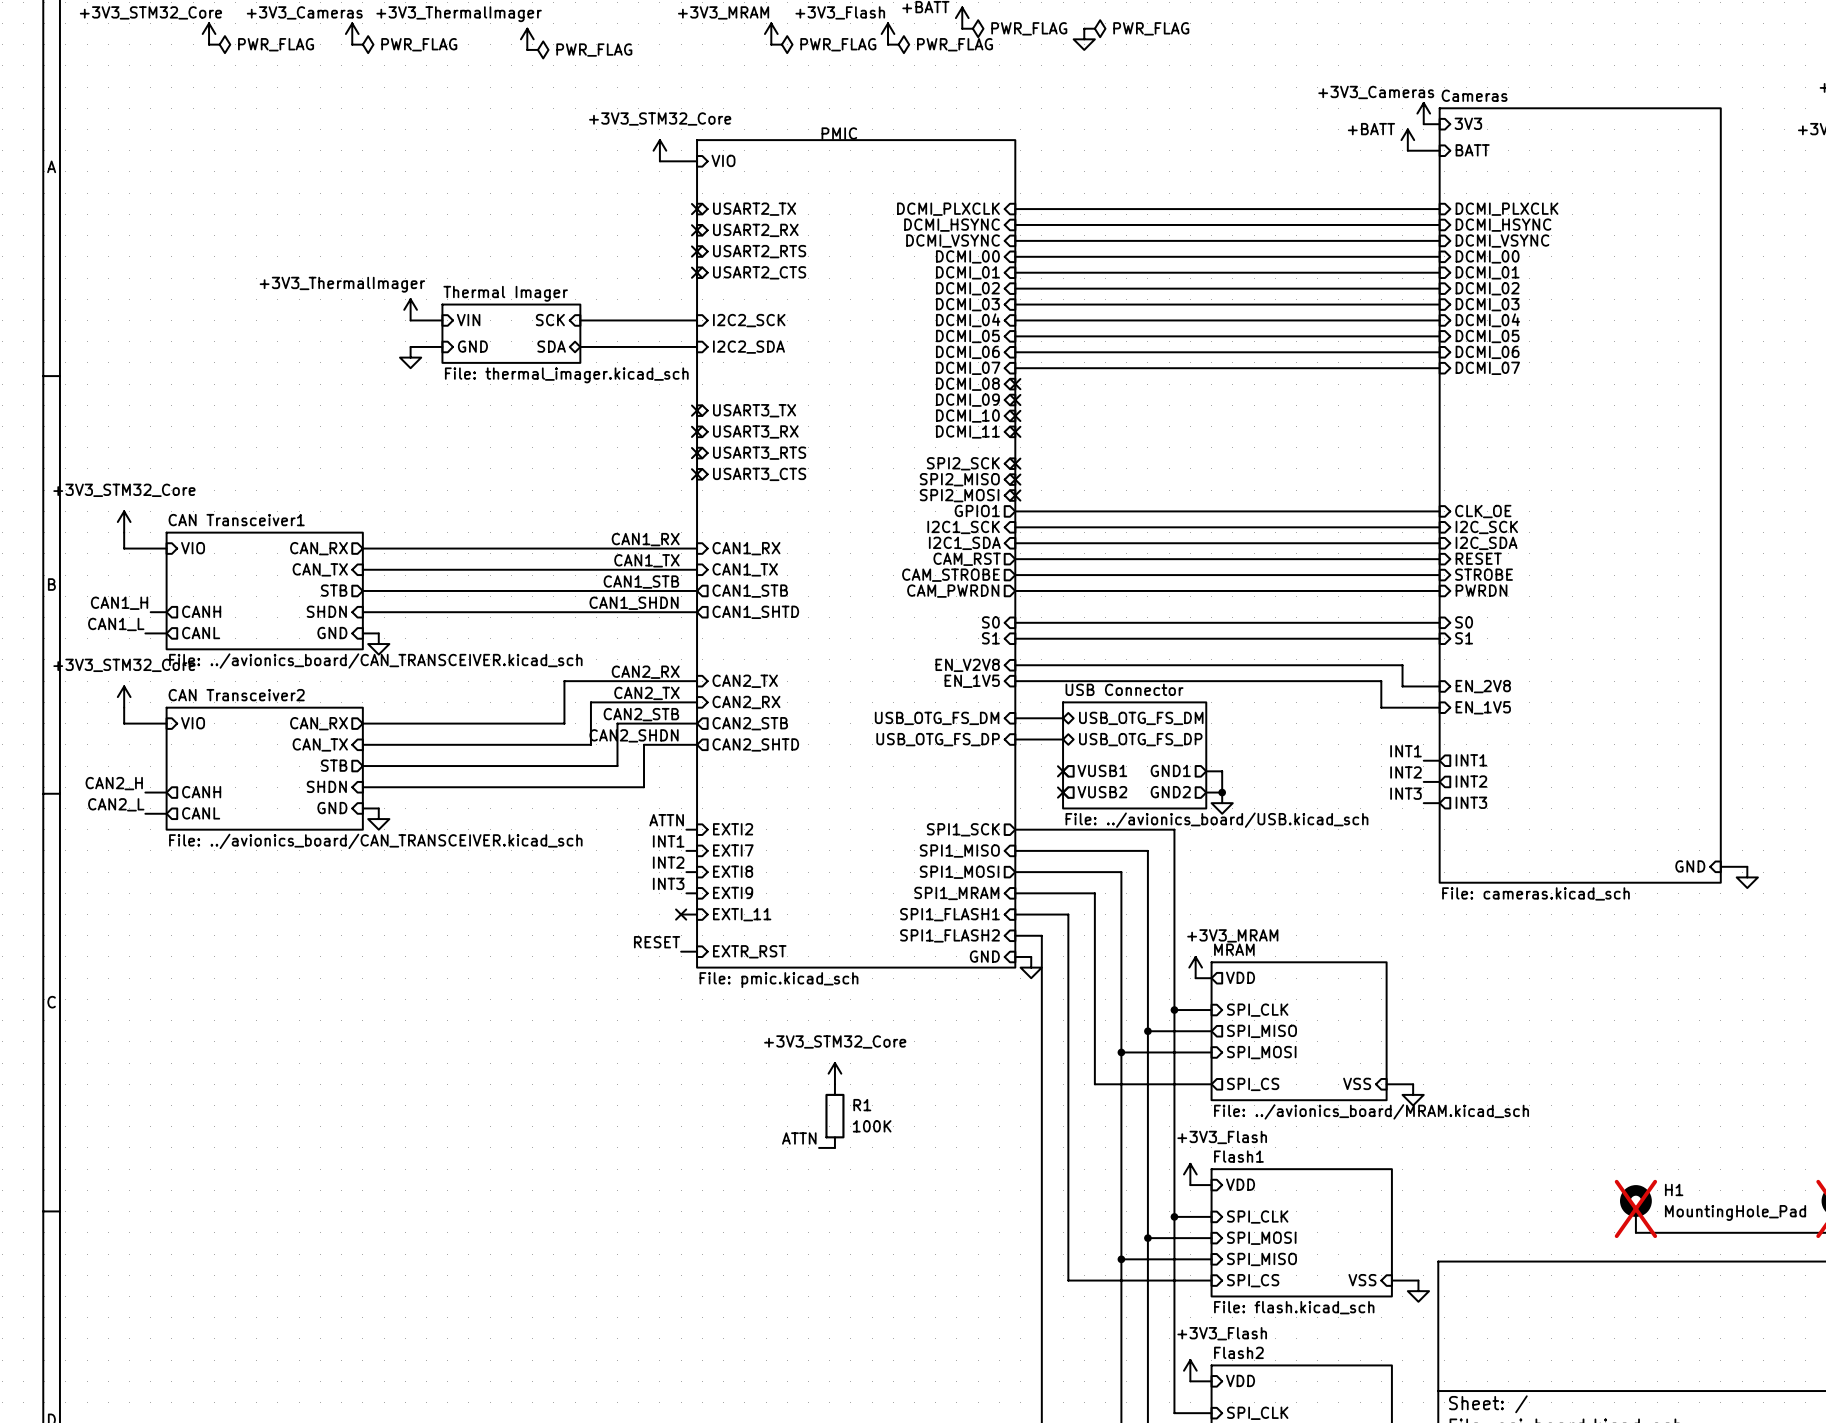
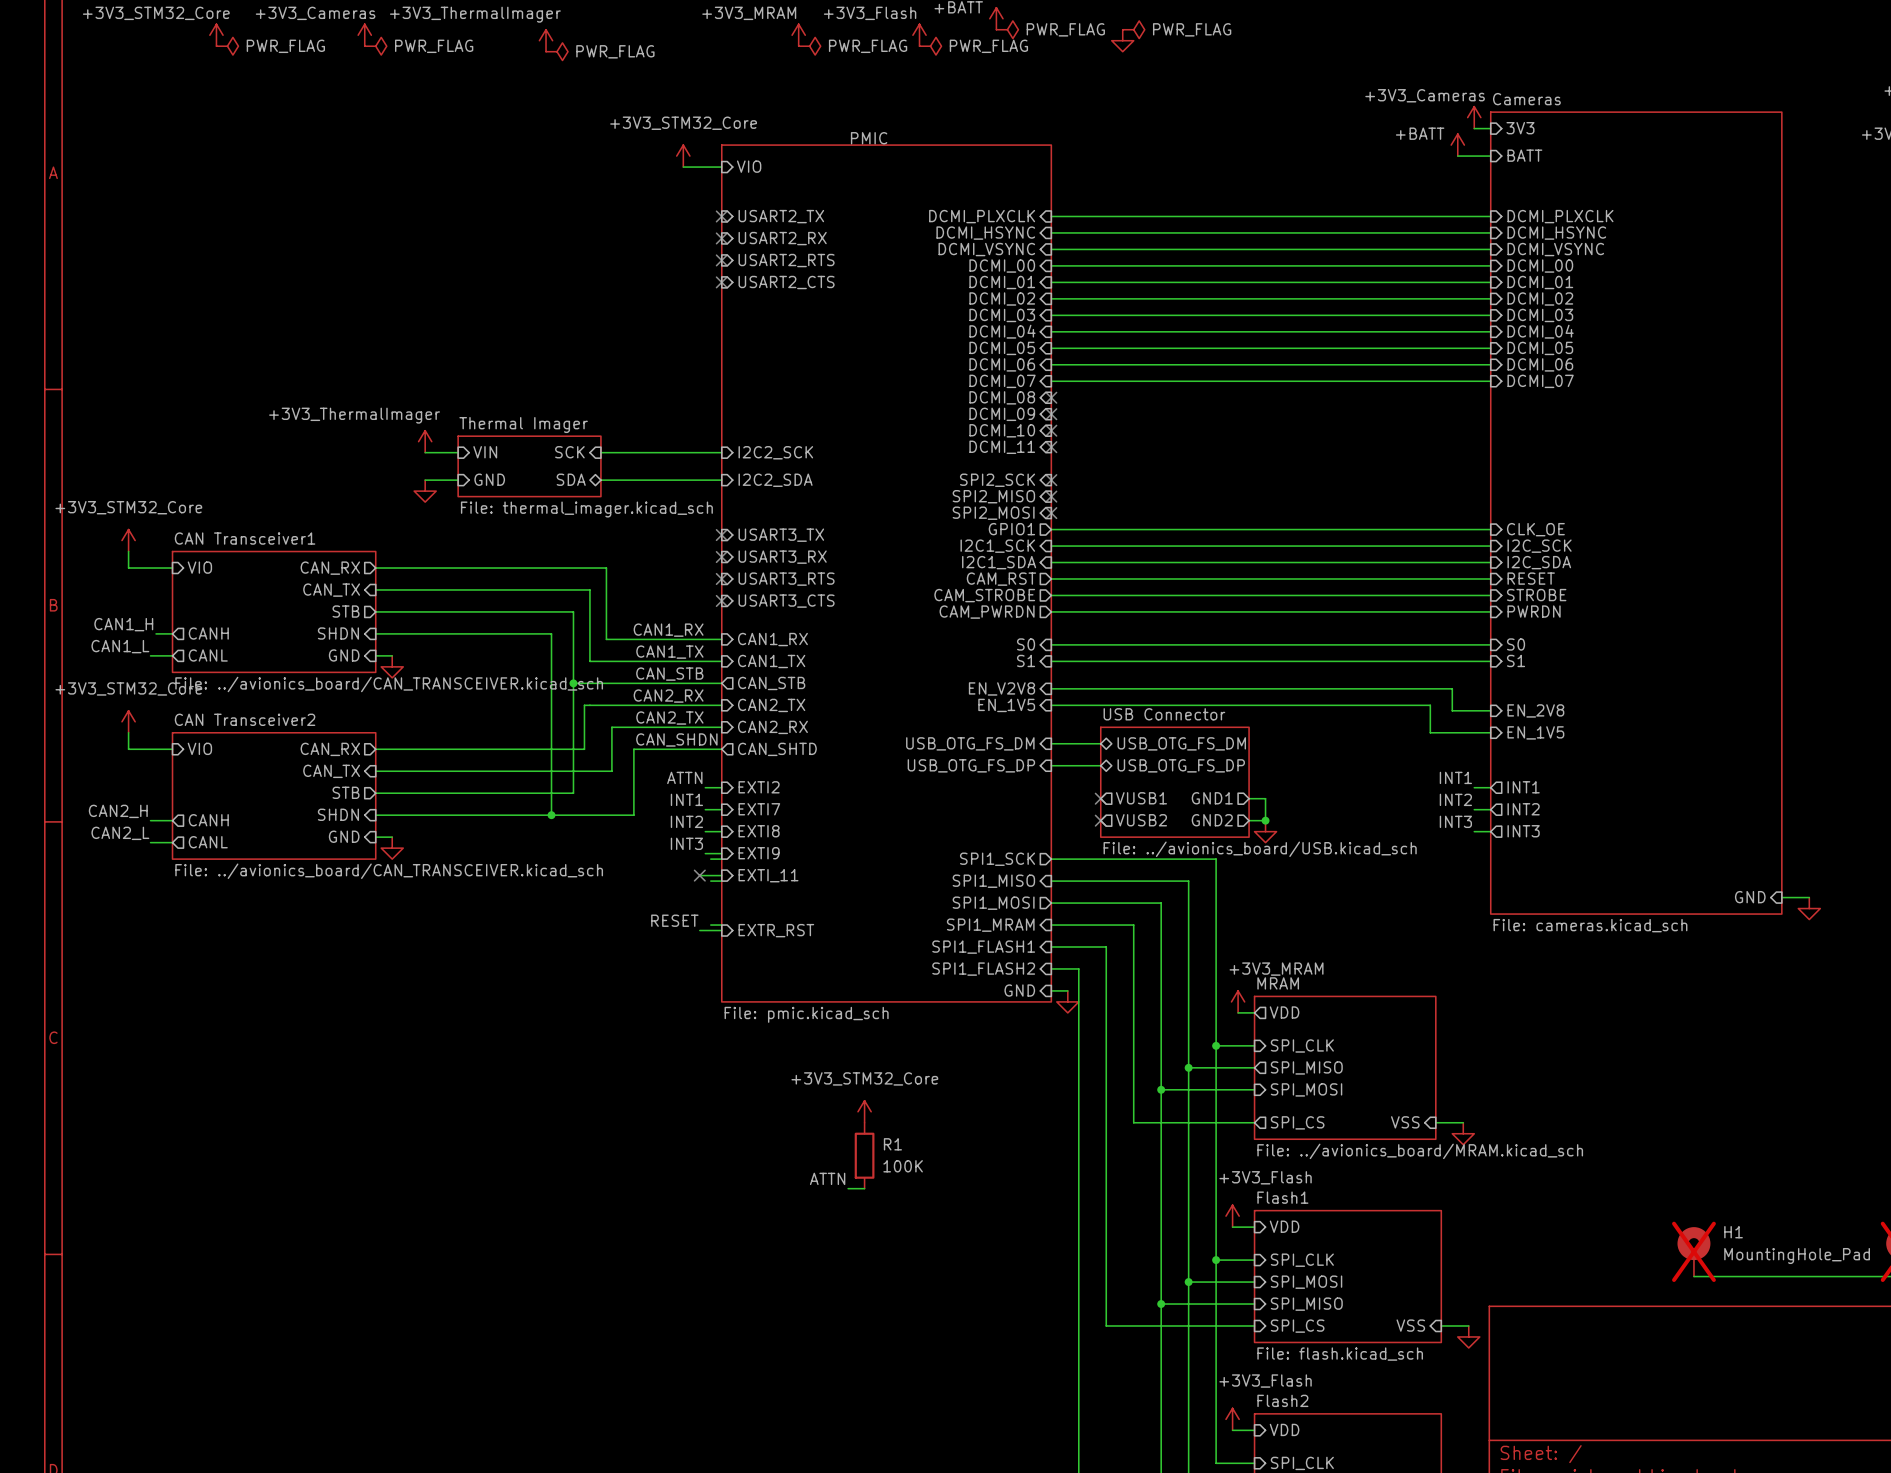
power symbol position: +3V3_ThermalImager (410, 309) -> +3V3_ThermalImager (425, 441)
wire: (410, 320) (442, 320) -> (425, 452) (458, 452)
sheet pin position: VIN (468, 320) -> VIN (485, 452)
sheet pin position: SCK (550, 320) -> SCK (569, 452)
wire: (580, 320) (697, 320) -> (600, 452) (721, 452)
sheet pin position: I2C2_SCK (749, 320) -> I2C2_SCK (775, 452)
sheet Thermal Imager position: (511, 333) -> (529, 466)
wire: (410, 346) (442, 346) -> (425, 480) (458, 480)
sheet pin position: GND (472, 346) -> GND (489, 479)
sheet pin position: SDA (551, 346) -> SDA (571, 479)
wire: (580, 346) (697, 346) -> (600, 480) (721, 480)
sheet pin position: I2C2_SDA (748, 347) -> I2C2_SDA (775, 480)
power symbol position: (410, 357) -> (425, 491)
no-connect mark: (697, 410) -> none
sheet pin position: USART3_TX (754, 410) -> USART3_TX (781, 535)
no-connect mark: (697, 431) -> none
sheet pin position: USART3_RX (755, 431) -> USART3_RX (782, 557)
no-connect mark: (697, 453) -> none
sheet pin position: USART3_RTS (759, 453) -> USART3_RTS (786, 579)
no-connect mark: (697, 474) -> none
sheet pin position: USART3_CTS (759, 474) -> USART3_CTS (786, 601)
no-connect mark: none -> (721, 535)
no-connect mark: none -> (721, 557)
label position: CAN1_RX (645, 539) -> CAN1_RX (668, 630)
wire: (585, 548) (697, 548) -> (606, 568) (606, 639) (721, 639)
sheet pin position: CAN1_RX (746, 548) -> CAN1_RX (772, 639)
no-connect mark: none -> (721, 578)
label position: CAN1_TX (646, 560) -> CAN1_TX (669, 652)
wire: (569, 569) (697, 569) -> (589, 589) (589, 661) (721, 661)
sheet pin position: CAN1_TX (745, 569) -> CAN1_TX (771, 661)
no-connect mark: none -> (721, 600)
label: CAN1_STB (641, 582) -> none
wire: (553, 590) (697, 590) -> (573, 611) (573, 793)
sheet pin: CAN1_STB (750, 591) -> none
label: CAN1_SHDN (634, 603) -> none
wire: (532, 612) (697, 612) -> (551, 633) (551, 815)
sheet pin: CAN1_SHTD (755, 612) -> none
label: none -> CAN_STB (669, 674)
wire: none -> (573, 683) (721, 683)
junction: none -> (573, 683)
sheet pin: none -> CAN_STB (771, 683)
label: CAN2_STB (641, 714) -> none
label: none -> CAN_SHDN (676, 739)
wire: (617, 723) (617, 766) (553, 766) -> (639, 749) (633, 749) (633, 815)
sheet pin: CAN2_STB (750, 723) -> CAN_SHTD (777, 749)
label: CAN2_SHDN (634, 735) -> none
wire: (697, 744) (644, 744) (644, 787) (612, 787) -> none
sheet pin: CAN2_SHTD (755, 744) -> none
wire: none -> (705, 787) (721, 787)
wire: none -> (705, 809) (721, 809)
junction: none -> (551, 815)
label position: ATTN (666, 820) -> ATTN (684, 777)
sheet pin position: EXTI2 (733, 829) -> EXTI2 (759, 787)
label position: INT1 (668, 841) -> INT1 (686, 799)
wire: none -> (699, 875) (721, 875)
no-connect mark: none -> (699, 875)
sheet pin position: EXTI7 (733, 850) -> EXTI7 (759, 809)
label position: INT2 (668, 862) -> INT2 (686, 821)
sheet pin position: EXTI8 (733, 871) -> EXTI8 (759, 831)
wire: (686, 872) (697, 872) -> none
label position: INT3 (668, 883) -> INT3 (686, 843)
sheet pin position: EXTI9 (733, 892) -> EXTI9 (759, 853)
wire: none -> (699, 930) (721, 930)
wire: (681, 914) (697, 914) -> (705, 853) (721, 853)
no-connect mark: (681, 914) -> none
sheet pin position: EXTI_11 (742, 914) -> EXTI_11 (768, 875)
label position: RESET (657, 942) -> RESET (674, 920)
wire: (681, 951) (697, 951) -> (705, 831) (721, 831)
sheet pin position: EXTR_RST (749, 951) -> EXTR_RST (776, 930)

